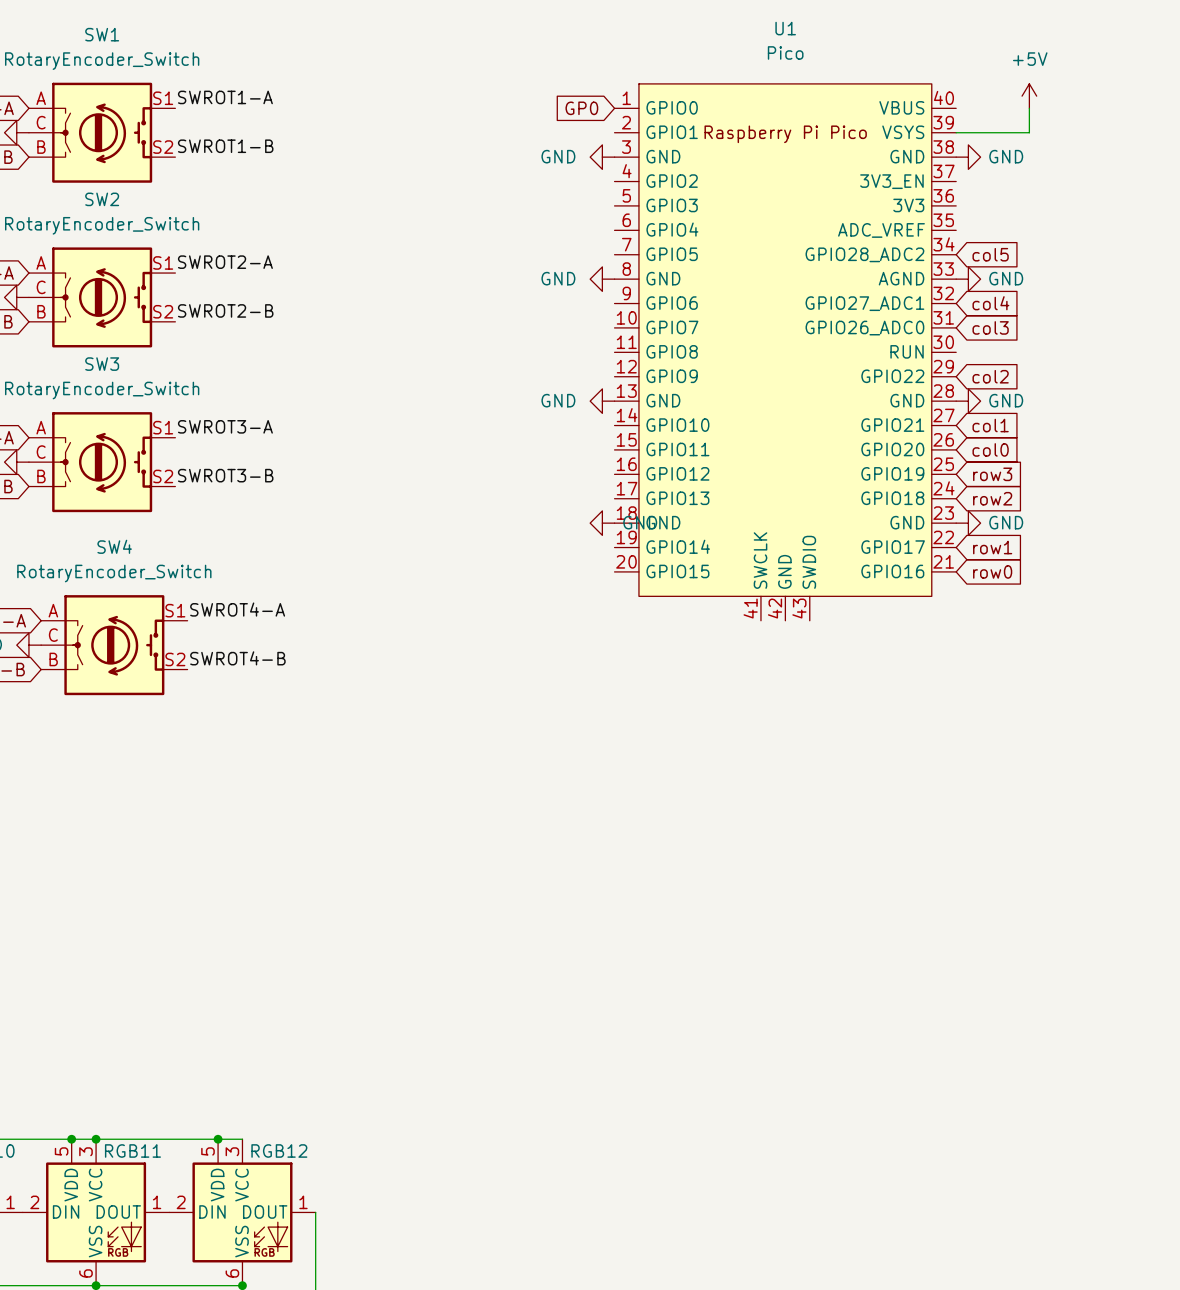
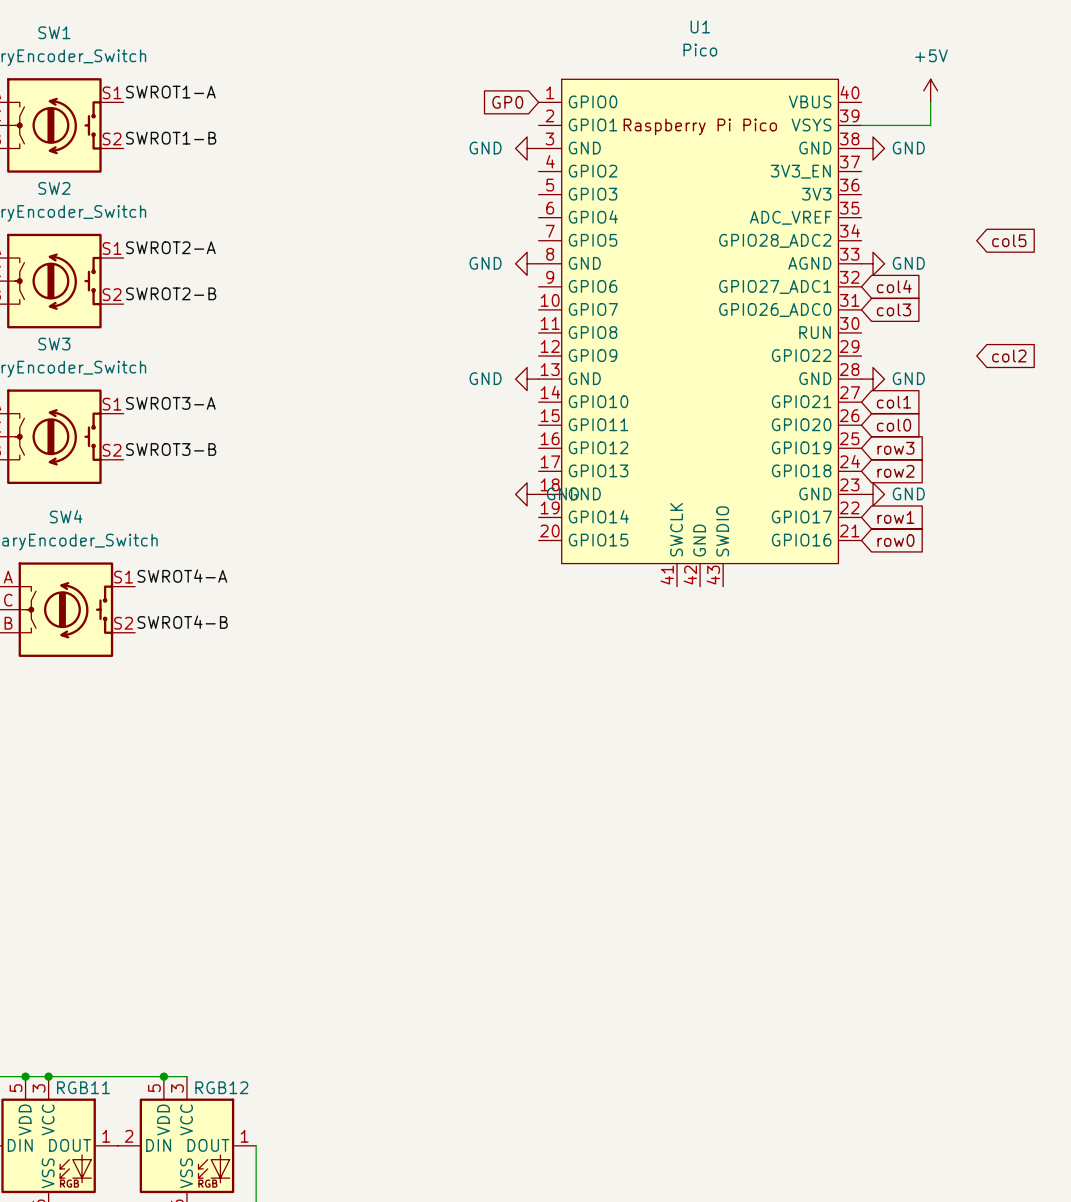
global label position: col5 (990, 254) -> col5 (1009, 240)
global label position: col2 (990, 376) -> col2 (1009, 356)

